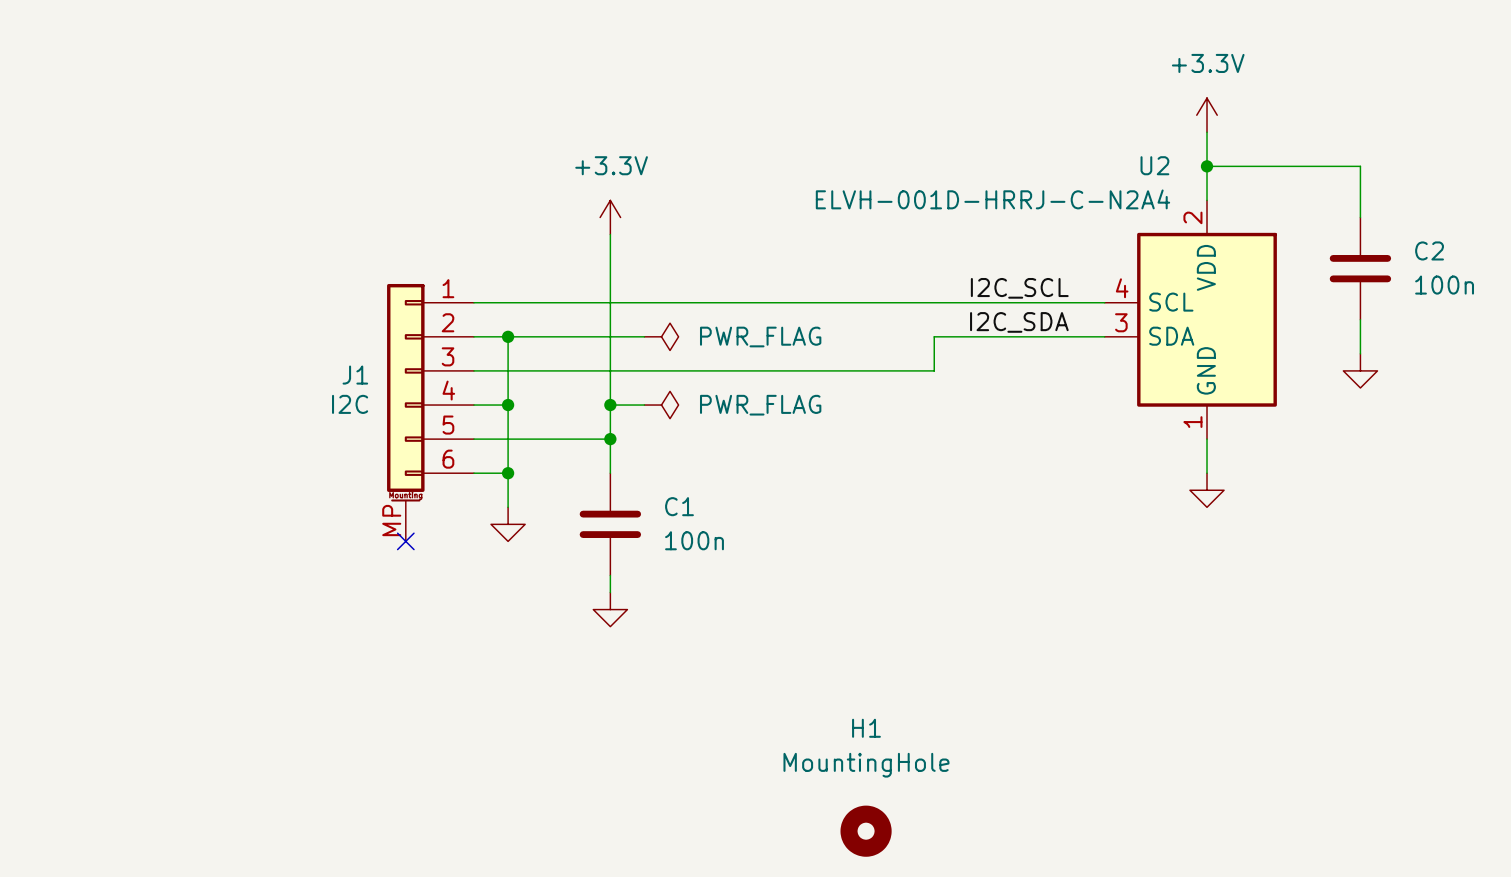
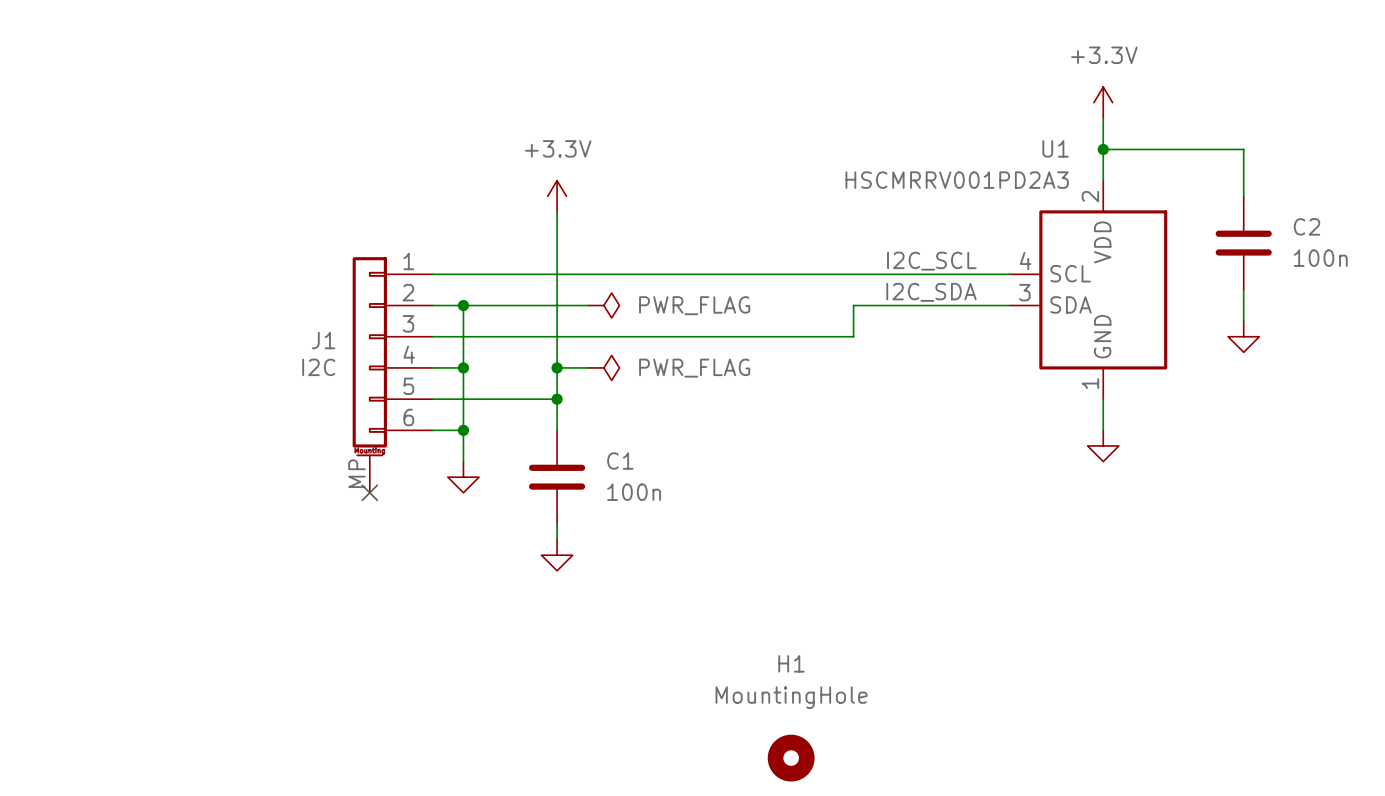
U2 name: U2 (1154, 165) -> U1 (1055, 148)
U2 value: ELVH-001D-HRRJ-C-N2A4 (992, 199) -> HSCMRRV001PD2A3 (957, 180)

